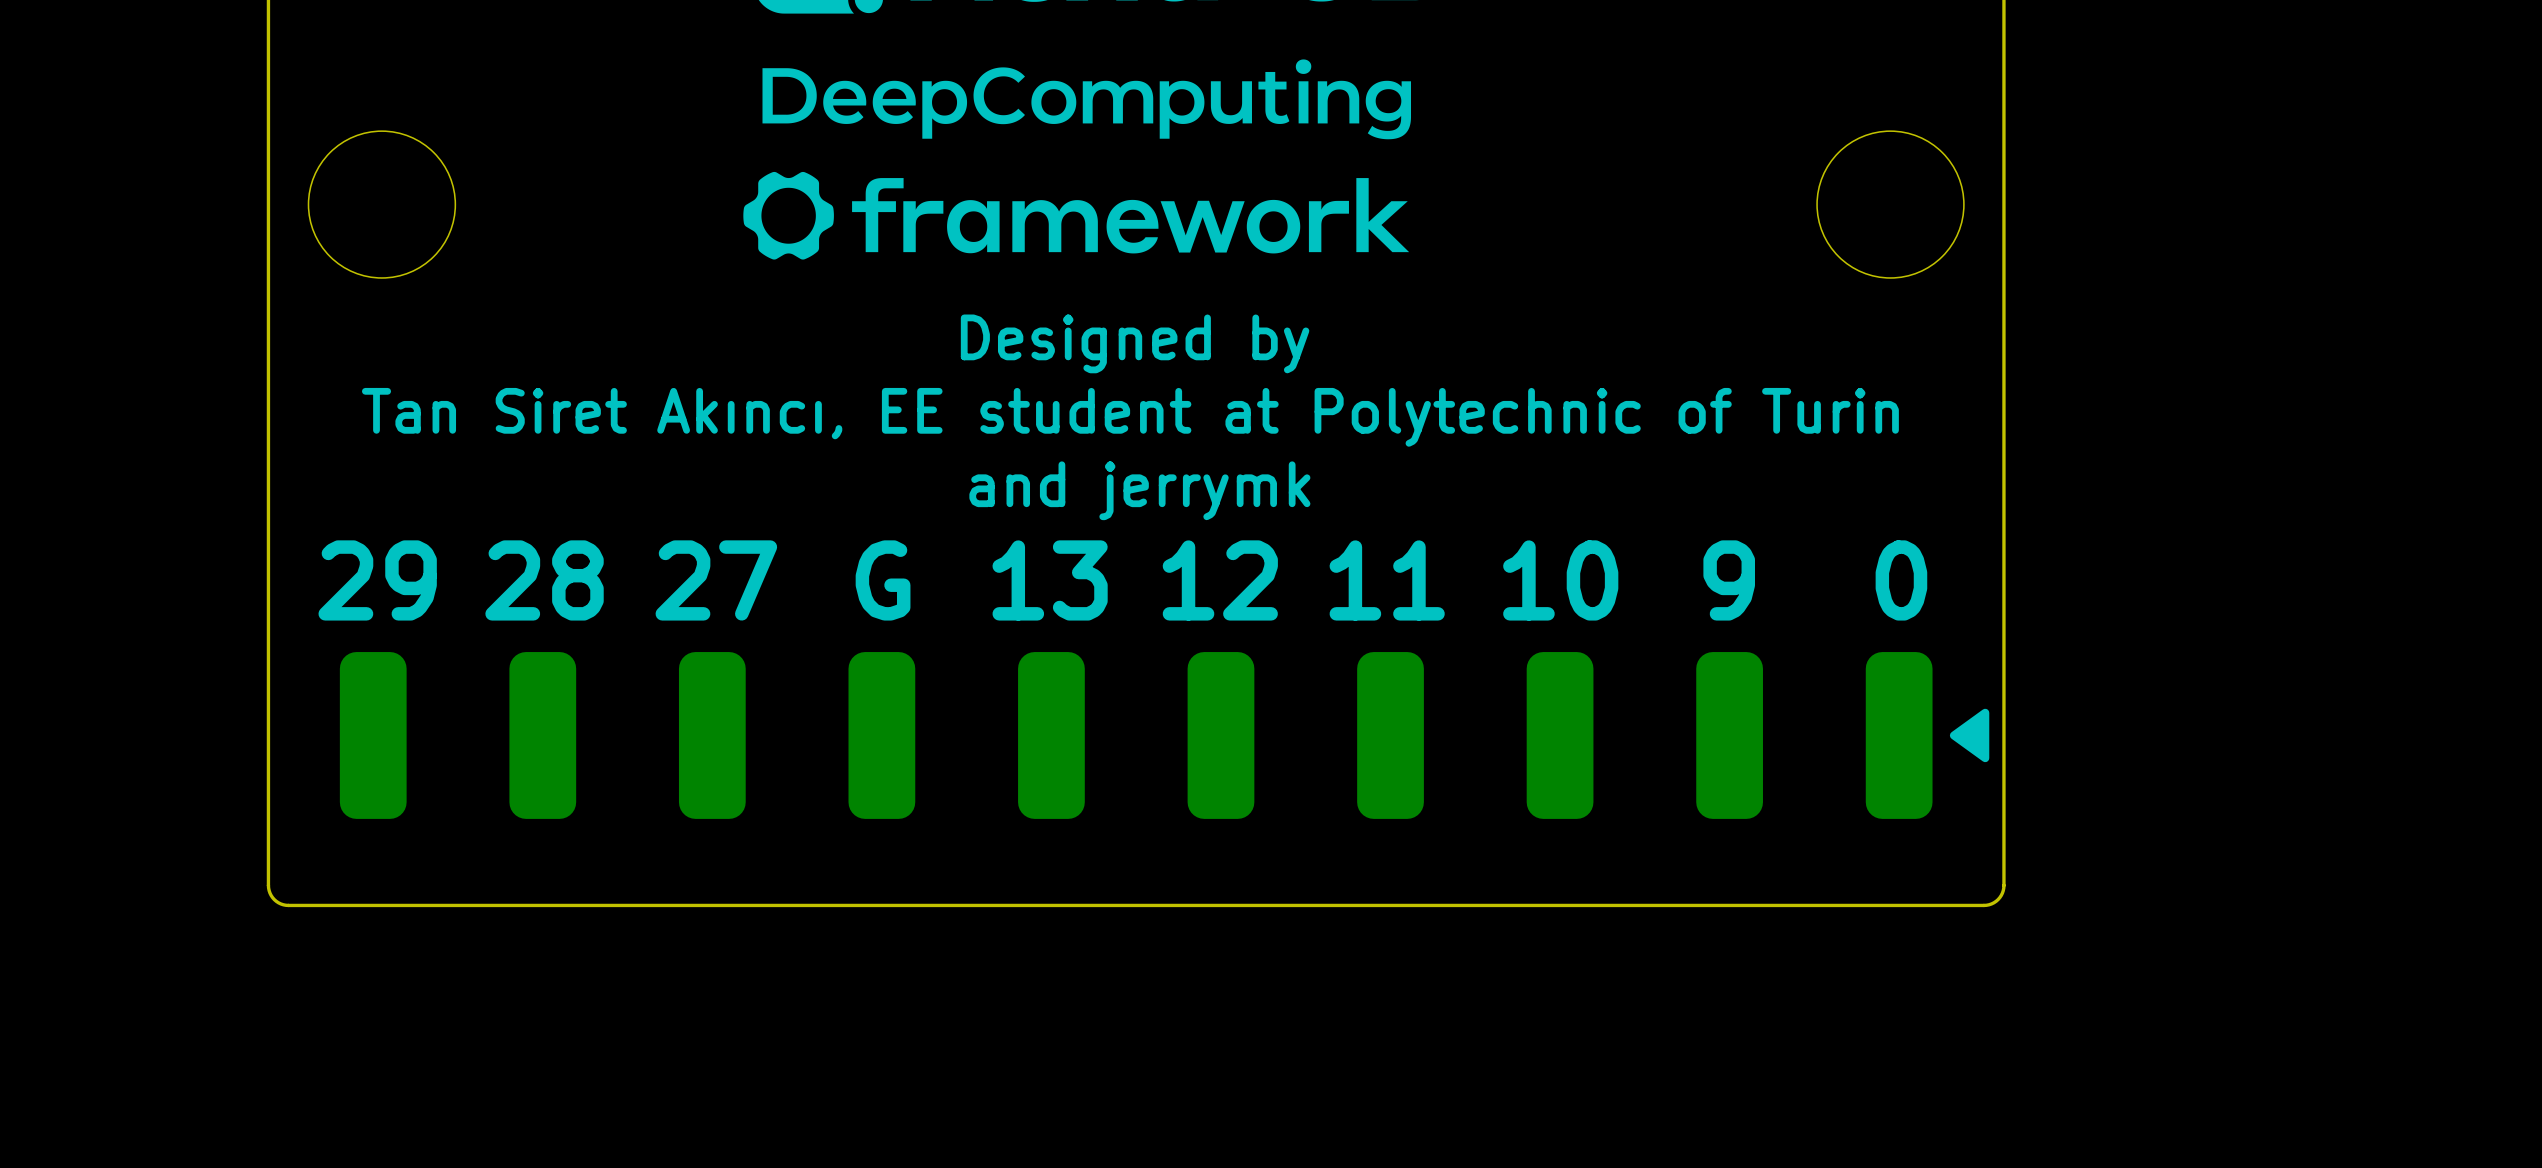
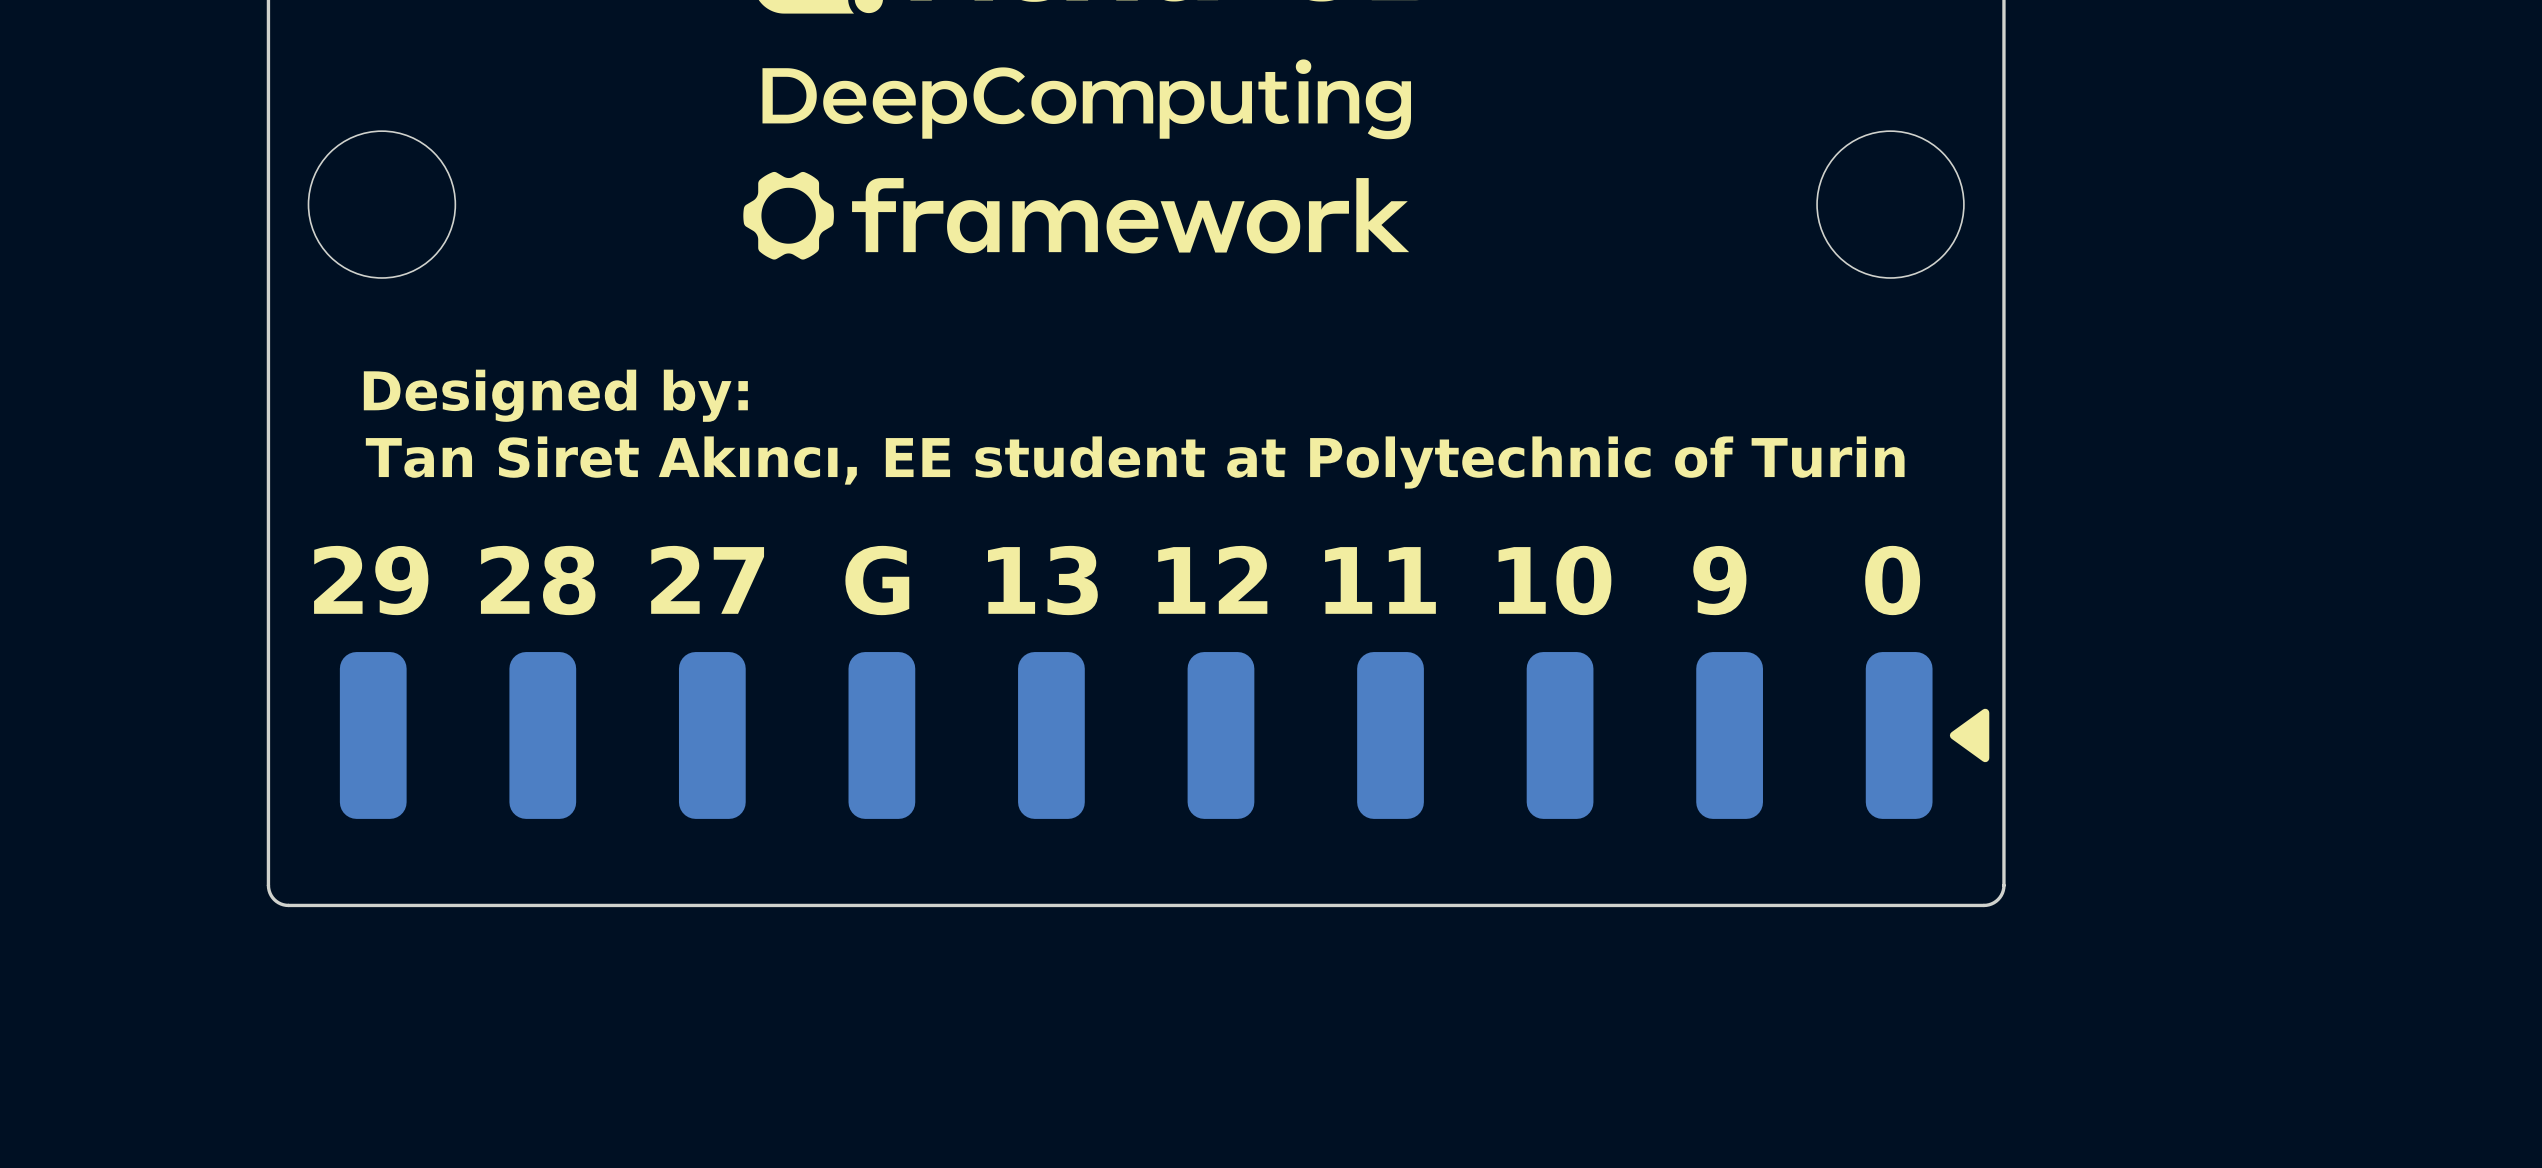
text: Designed by (1135, 343) -> none
text: none -> Designed by: (555, 395)
text position: Tan Siret Akıncı, EE student at Polytechnic of Turin (1130, 417) -> Tan Siret Akıncı, EE student at Polytechnic of Turin (1135, 462)
text: and jerrymk (1139, 490) -> none

